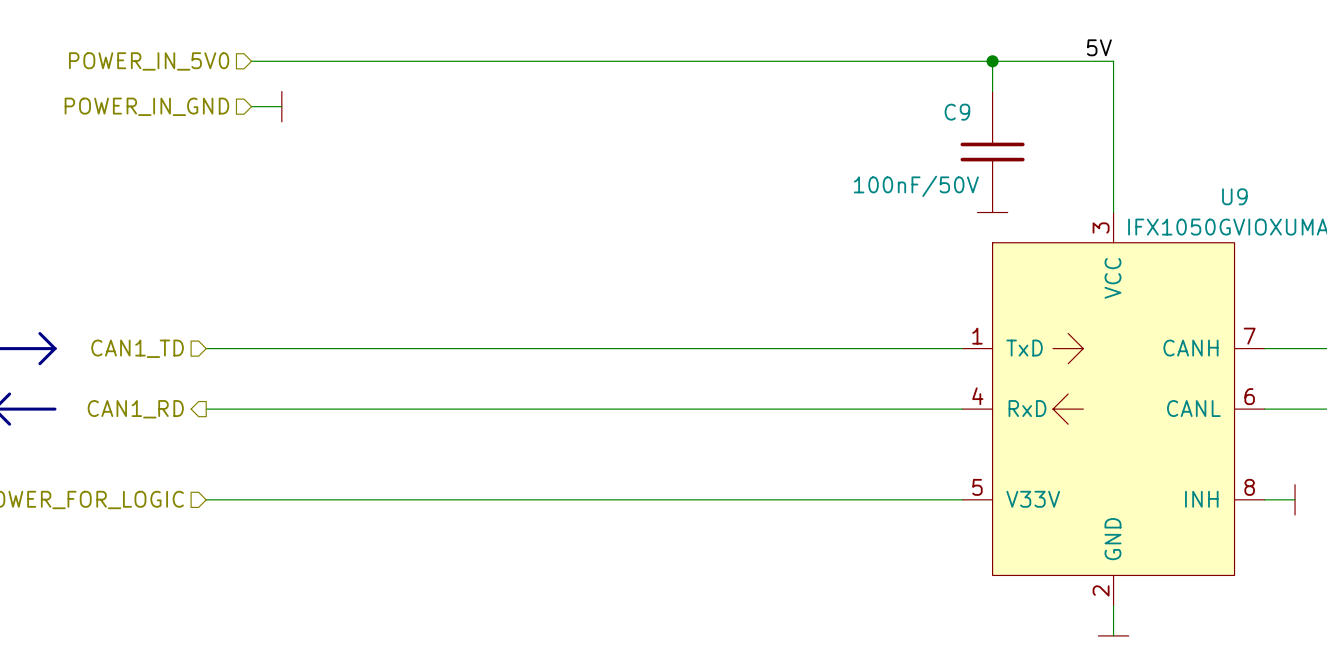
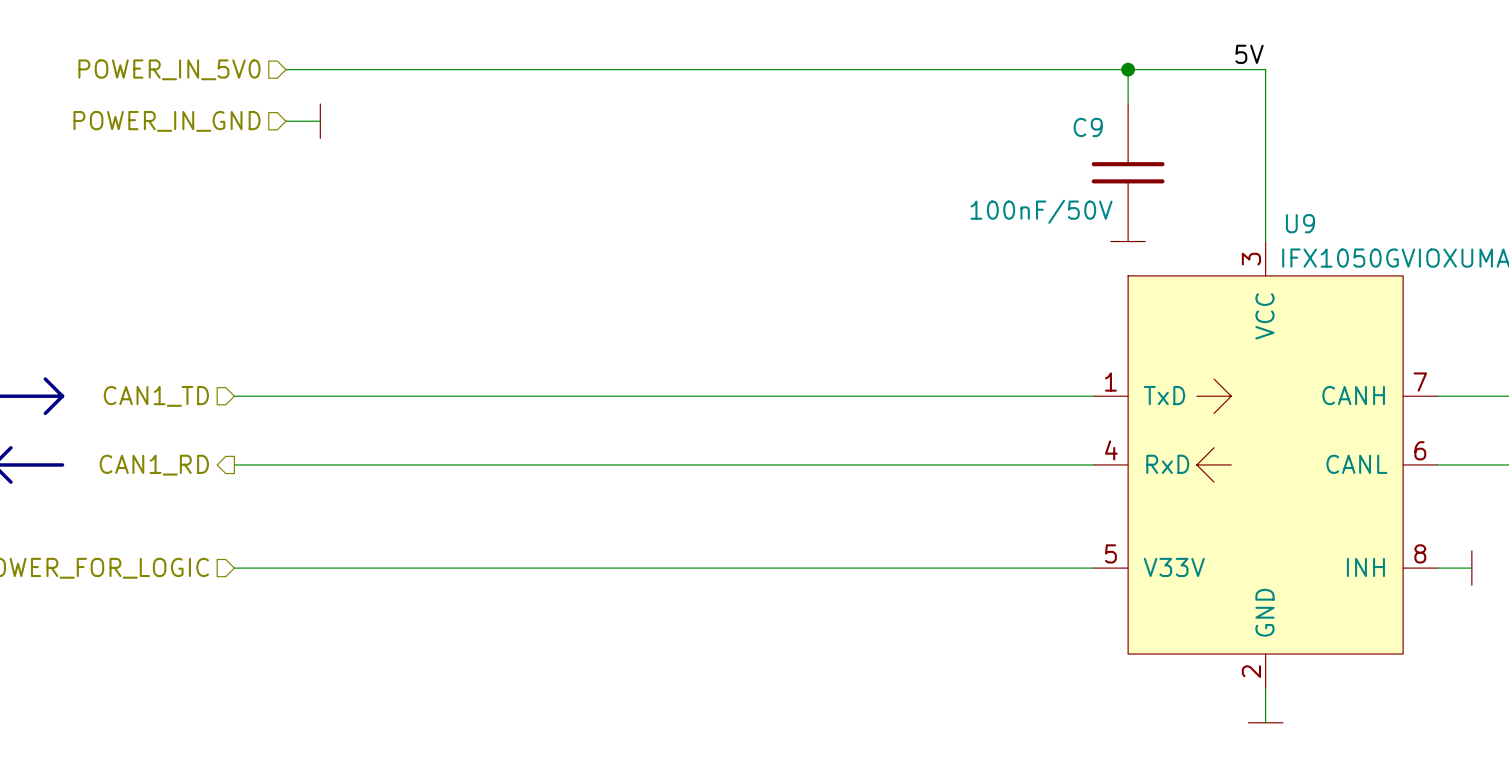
U9 name position: U9 (1234, 196) -> U9 (1300, 223)

